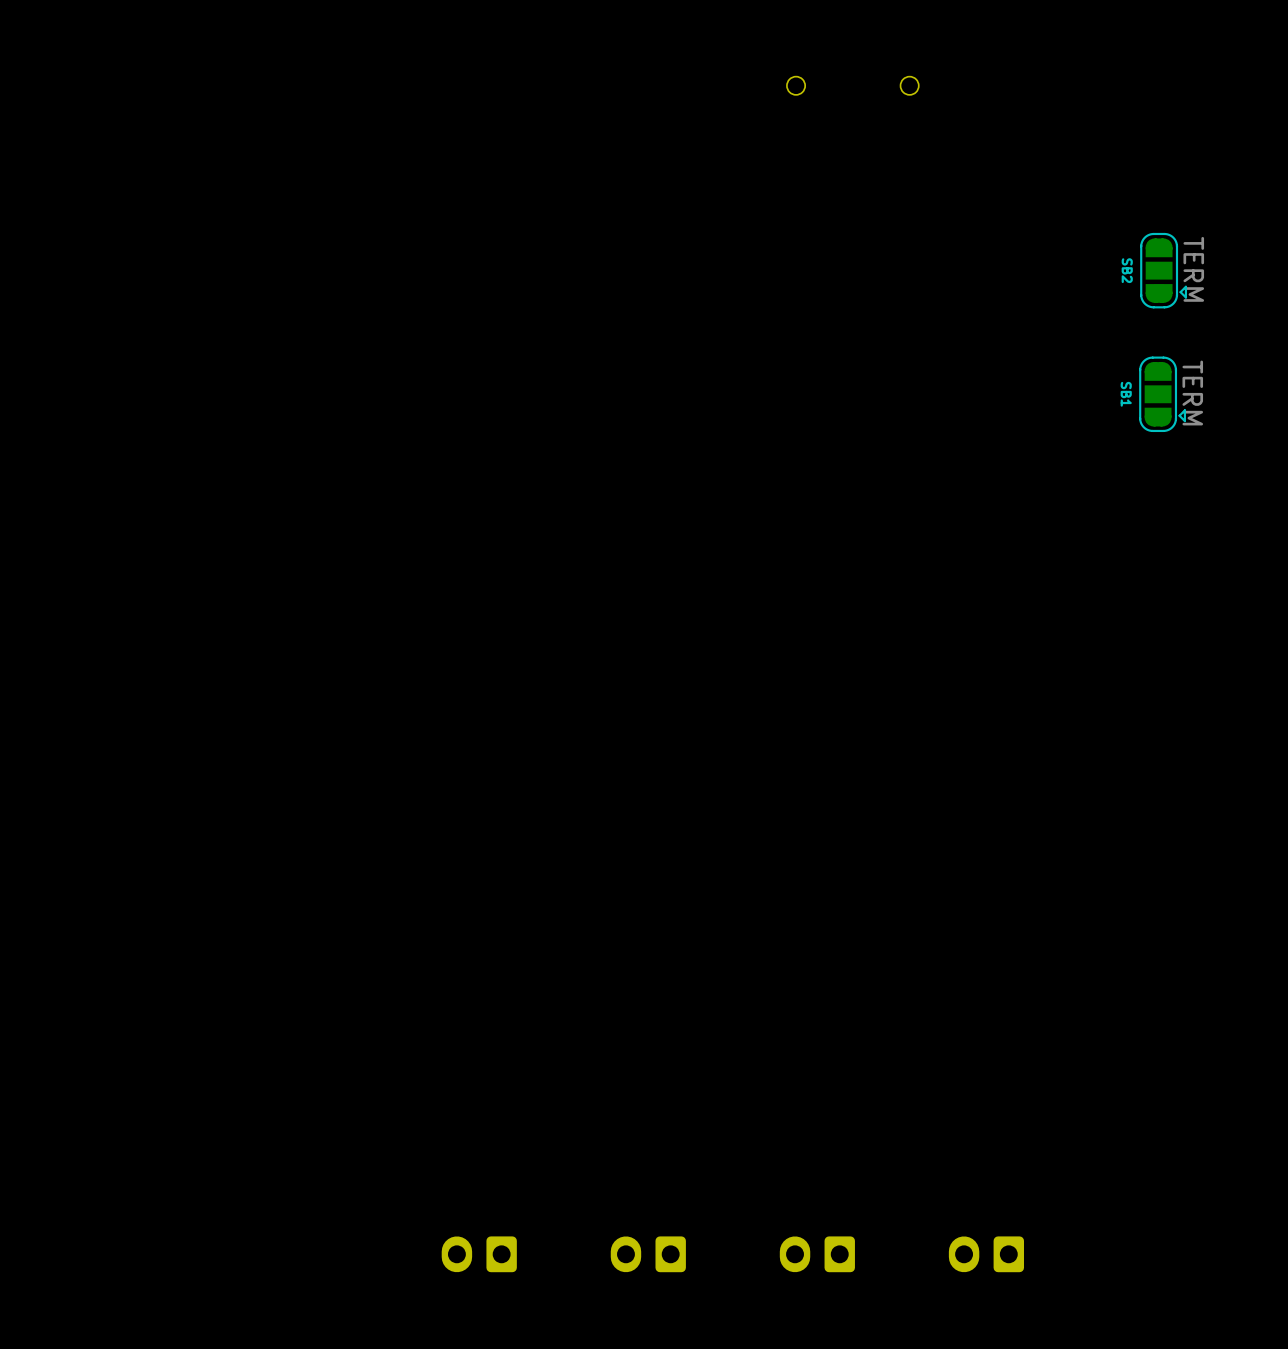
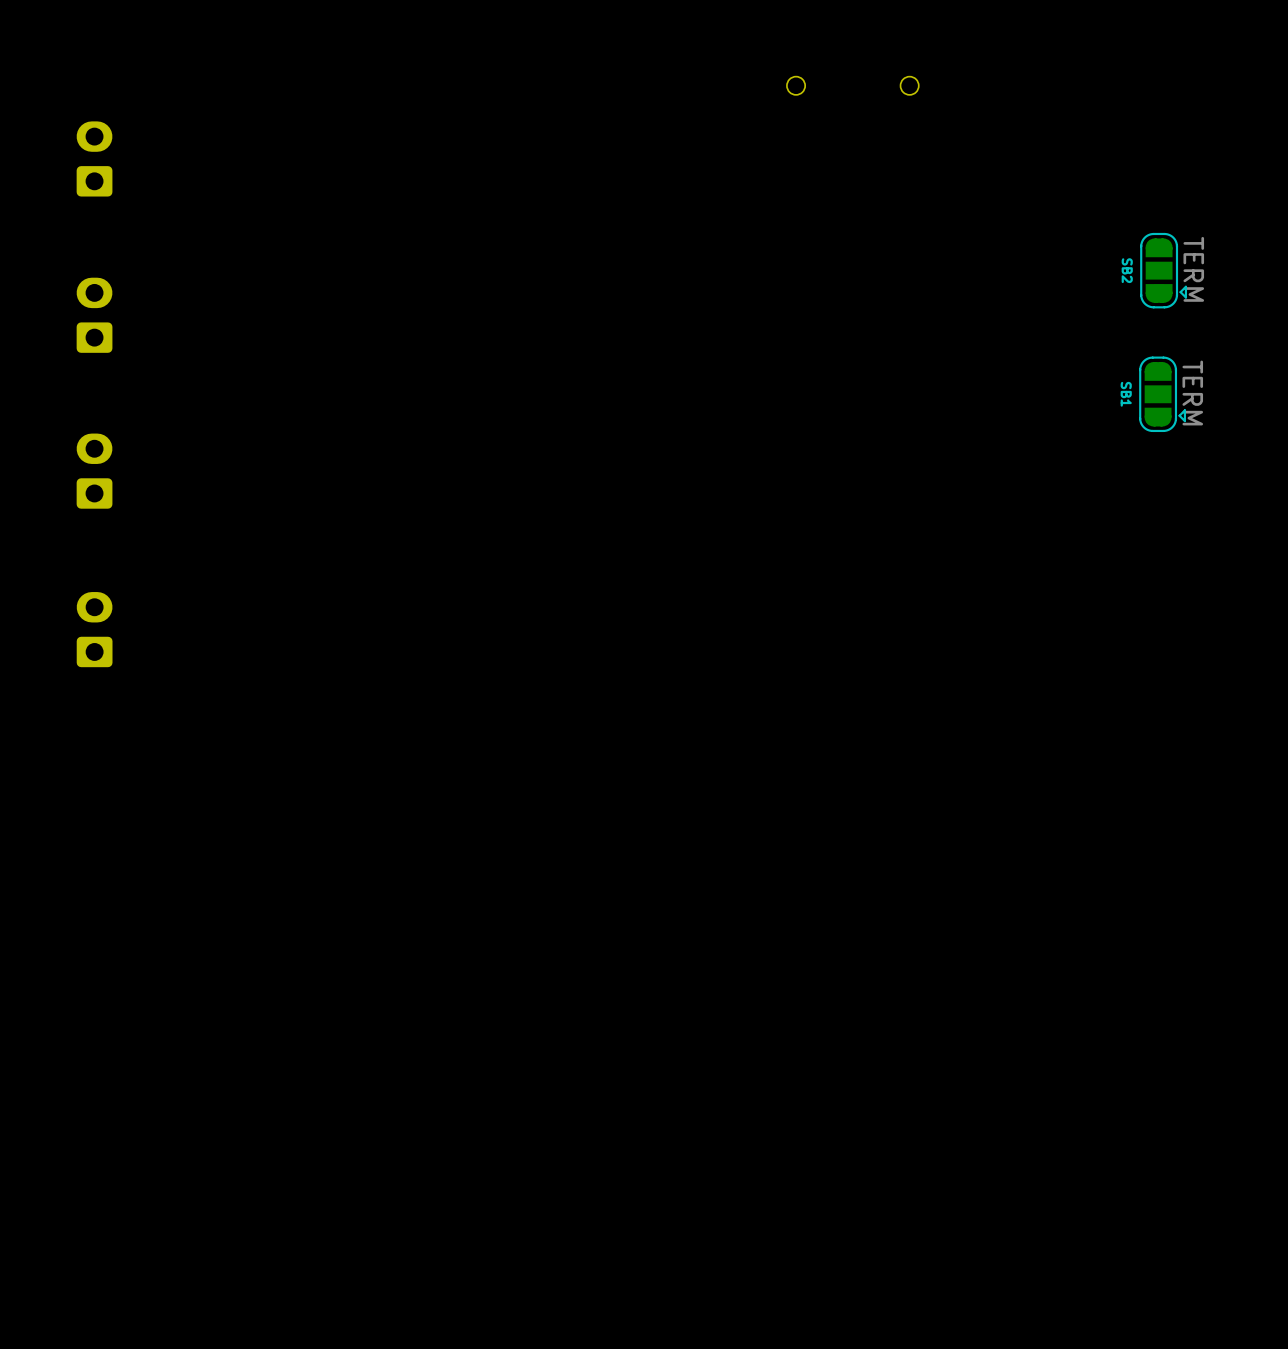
part: none -> (94, 158)
part: none -> (94, 315)
part: none -> (94, 471)
part: none -> (94, 629)
part: (479, 1254) -> none
part: (648, 1254) -> none
part: (817, 1254) -> none
part: (986, 1254) -> none

